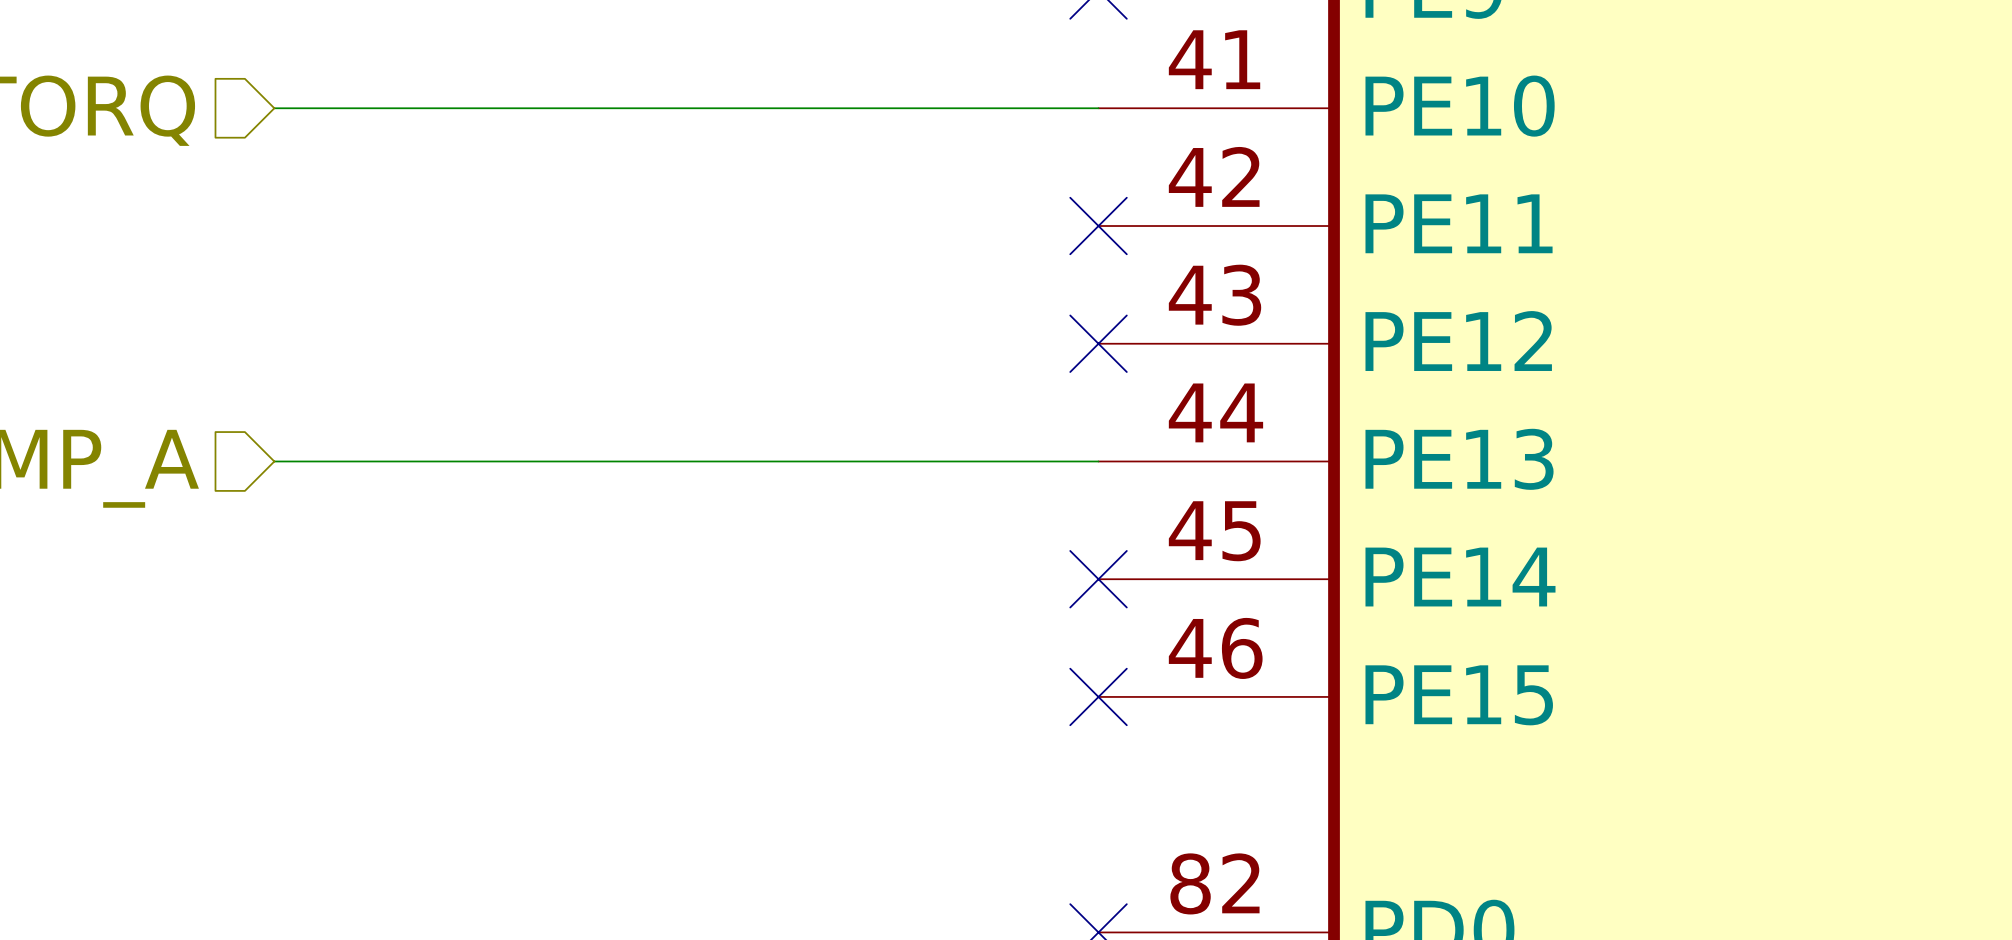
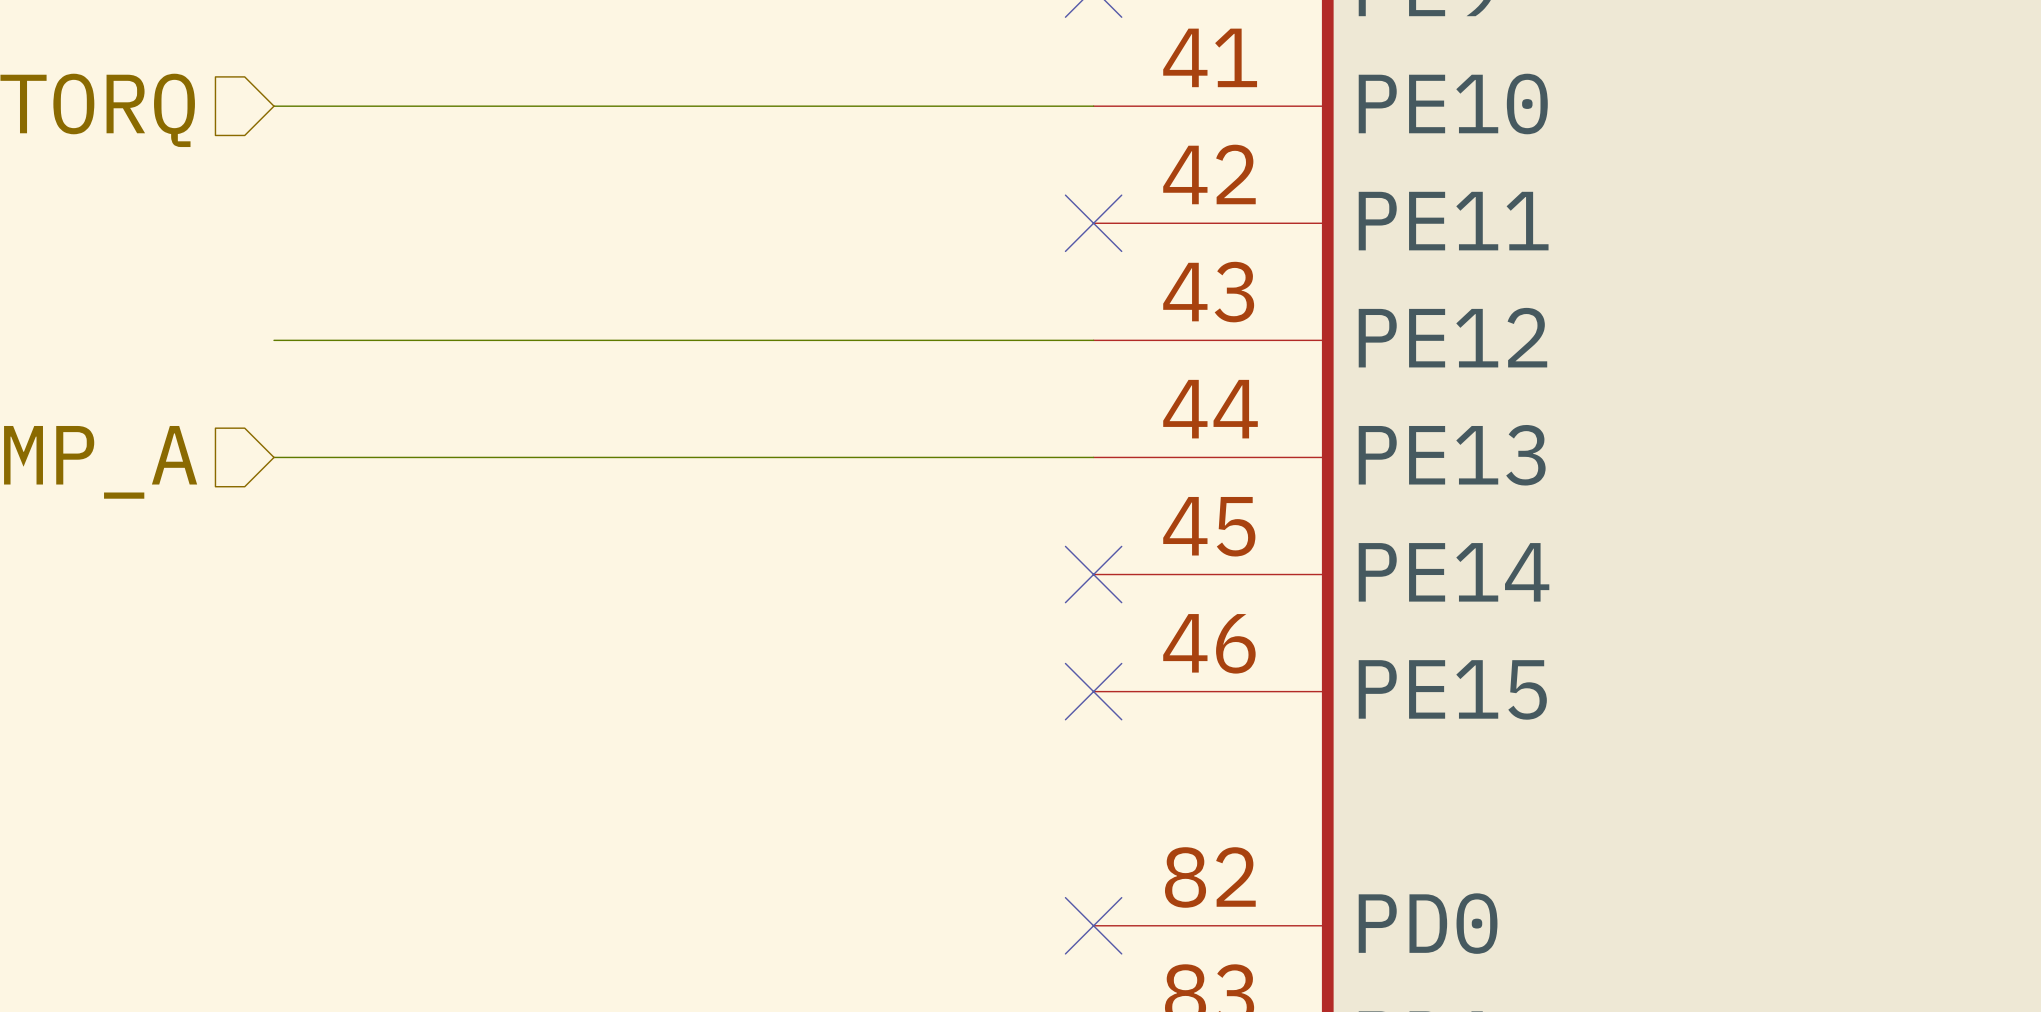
wire: none -> (274, 340) (1093, 340)
no-connect mark: (1098, 343) -> none

